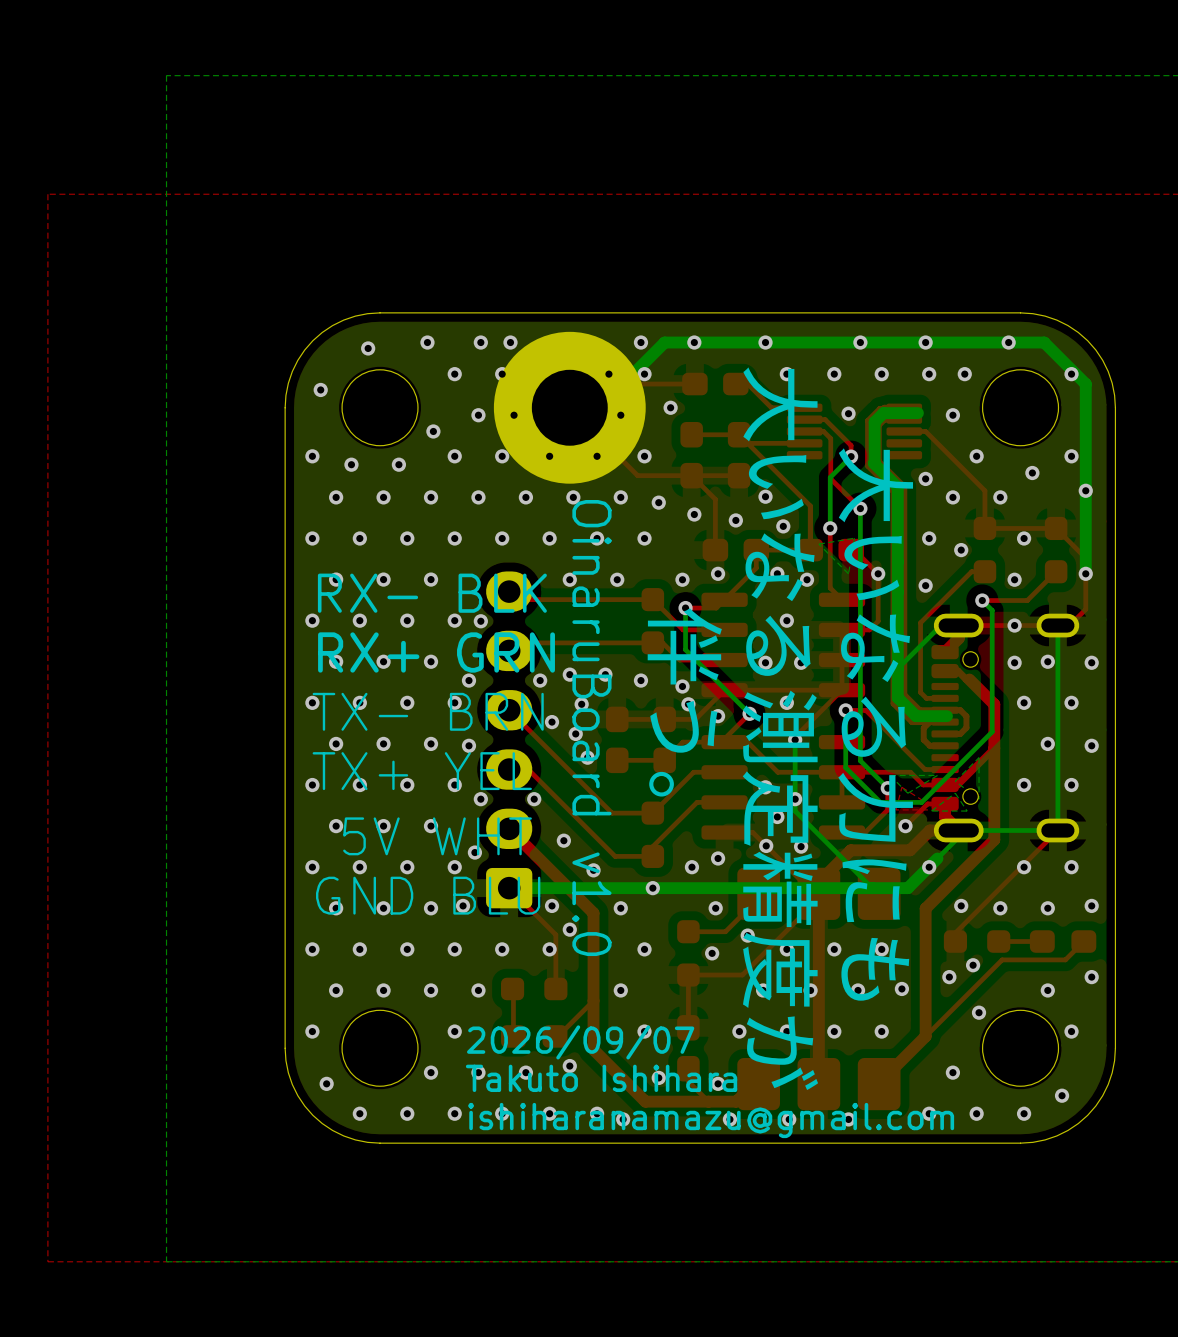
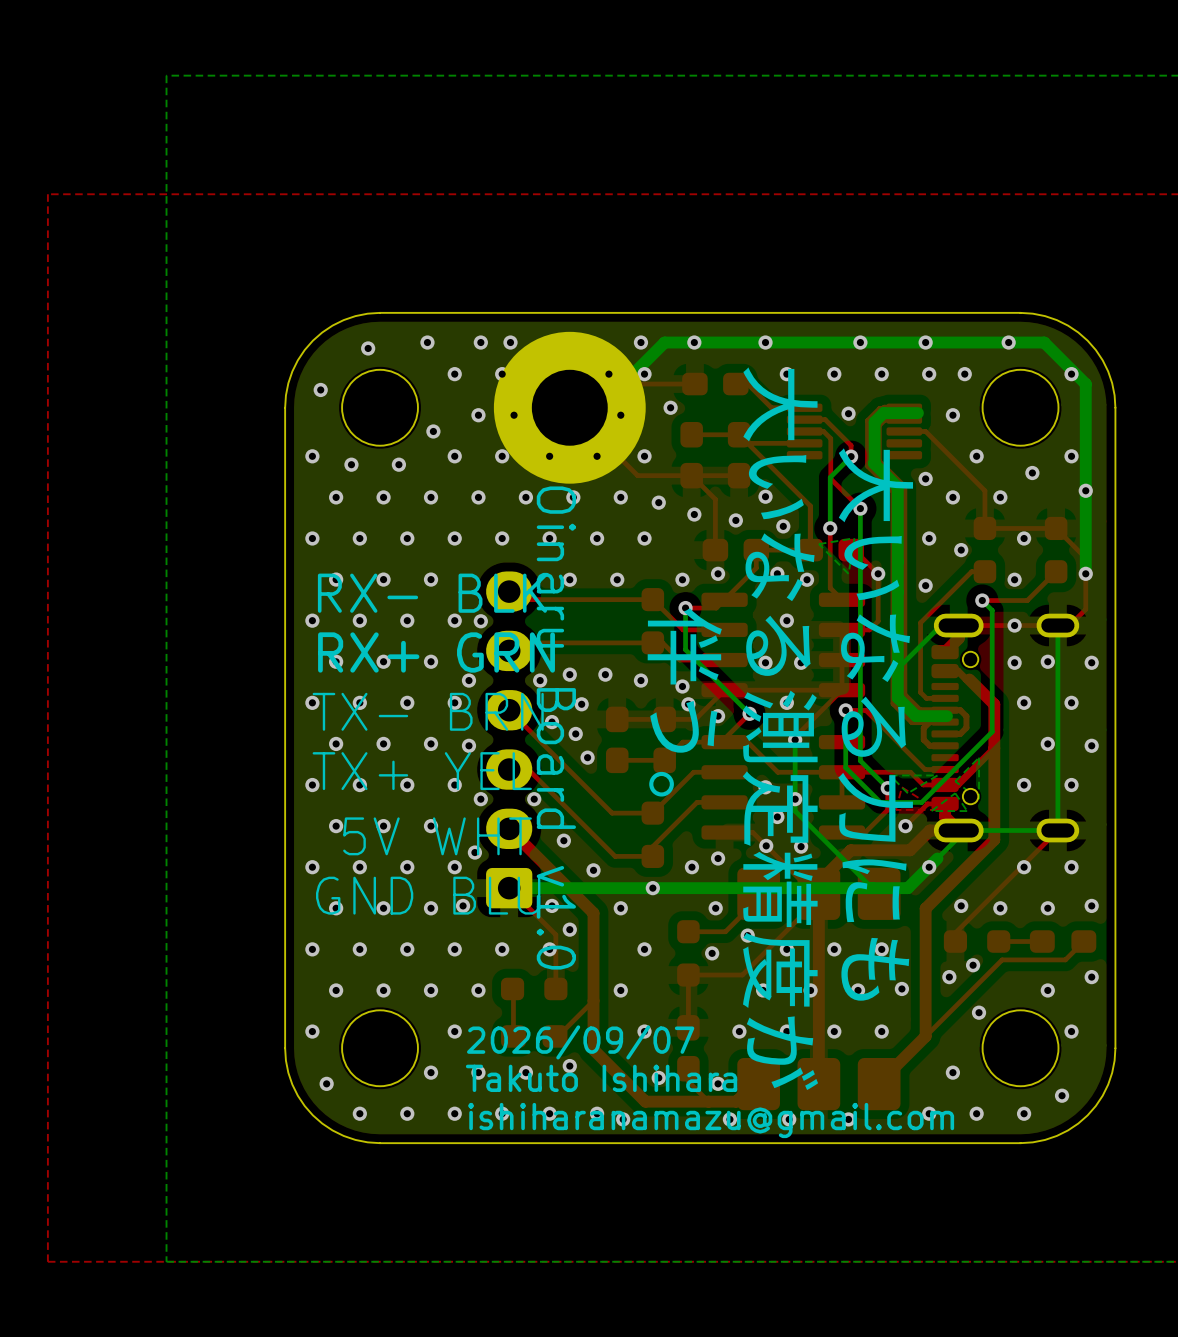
text: OinaruBoard v1.0 (591, 728) -> Oinaru Board v1.0 (556, 728)

